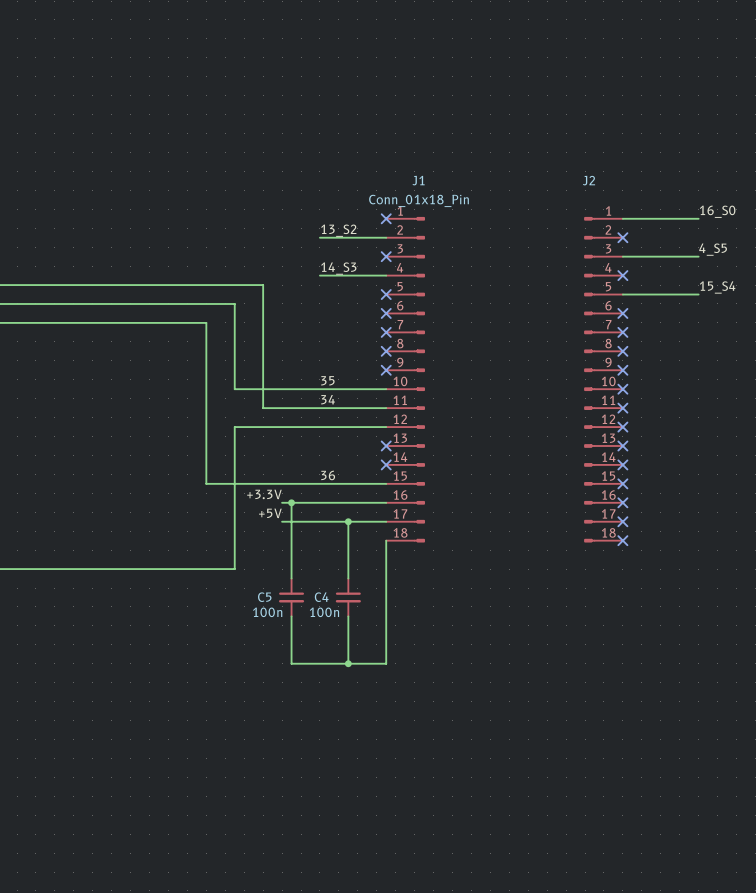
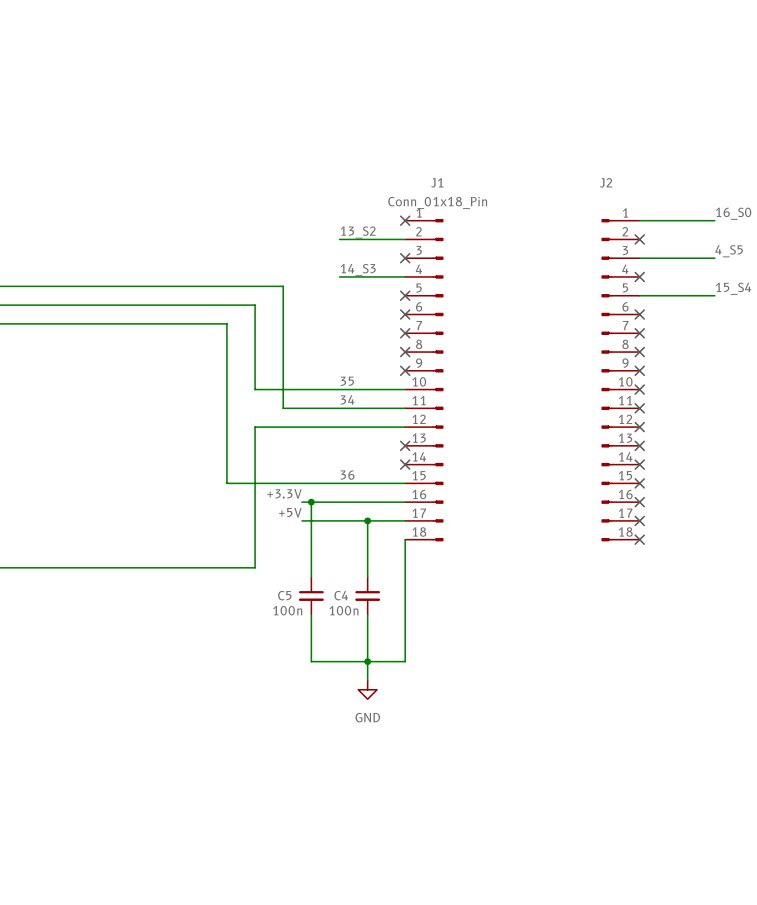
wire: none -> (367, 661) (367, 680)
power symbol: none -> GND (367, 689)

